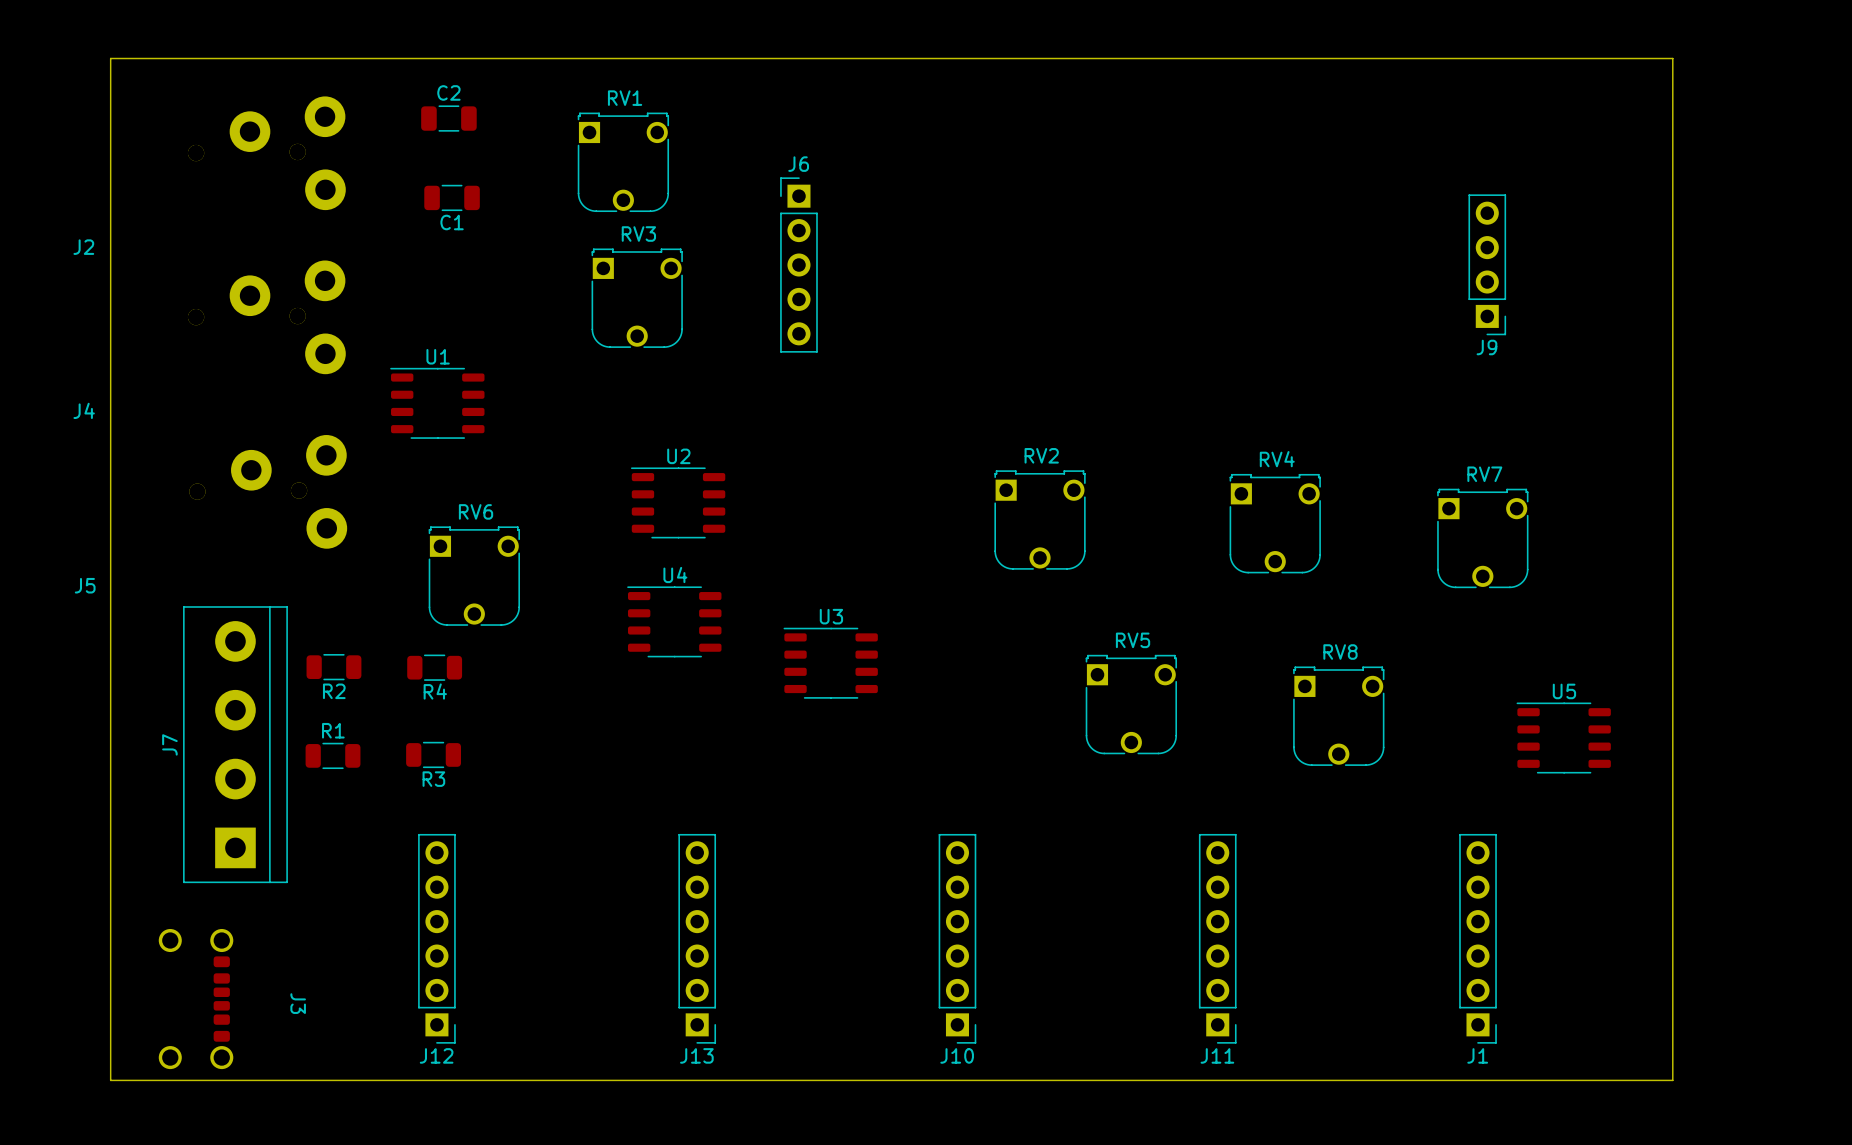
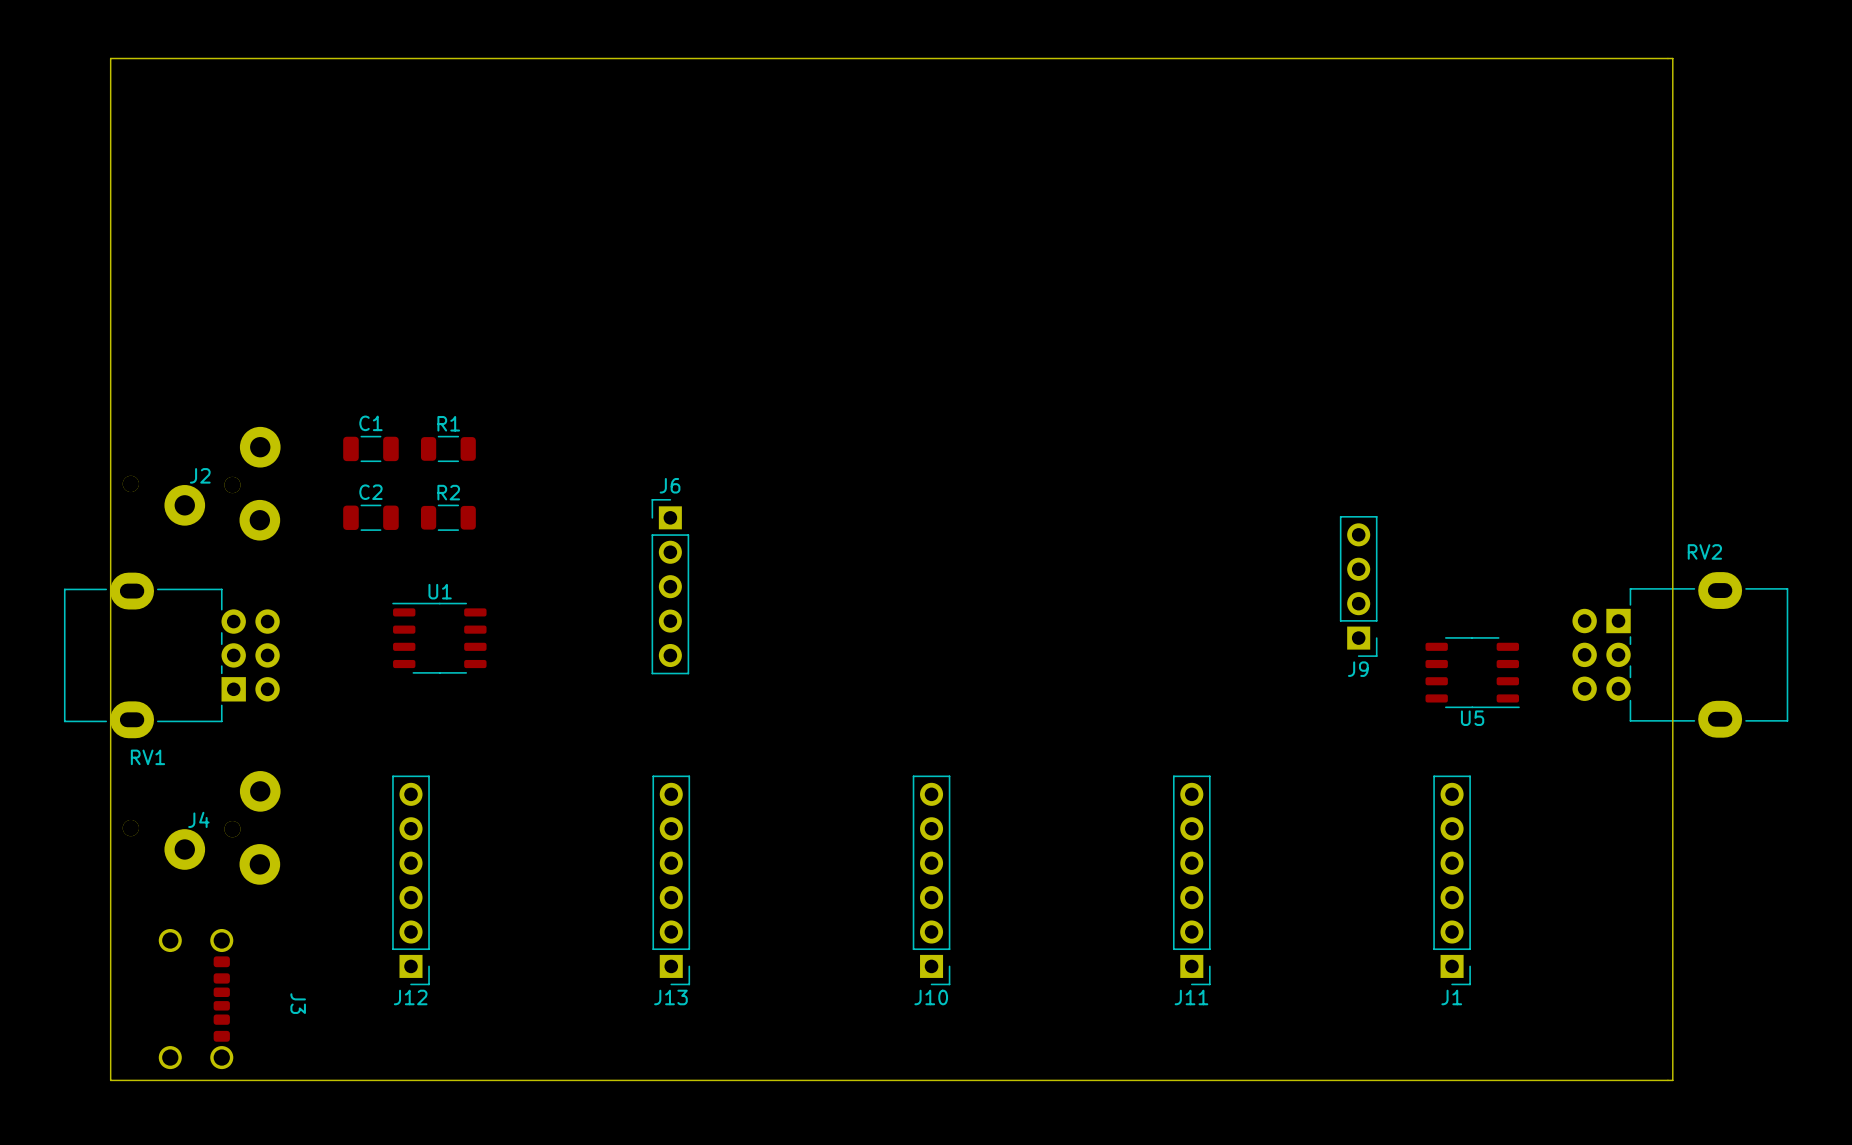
J2 footprint: [187, 96, 346, 211] -> [122, 426, 281, 541]
RV1 name position: RV1 (625, 98) -> RV1 (147, 757)
RV1 footprint: [577, 112, 670, 213] -> [63, 572, 280, 739]
C2 position: (448, 118) -> (370, 517)
C1 position: (452, 197) -> (370, 448)
C1 name position: C1 (452, 222) -> C1 (370, 423)
J2 name position: J2 (83, 247) -> J2 (200, 475)
J4 footprint: [187, 260, 346, 375] -> [122, 771, 281, 885]
J9 position: (1487, 264) -> (1358, 586)
J6 position: (798, 265) -> (670, 586)
RV3: (637, 298) -> none
U1 position: (437, 403) -> (439, 638)
J4 name position: J4 (84, 410) -> J4 (198, 819)
RV2 name position: RV2 (1041, 455) -> RV2 (1704, 551)
RV2 footprint: [994, 470, 1086, 570] -> [1572, 572, 1789, 738]
J5: (268, 491) -> none
U2: (678, 502) -> none
RV4: (1275, 523) -> none
RV7: (1482, 538) -> none
RV6: (474, 576) -> none
U4: (674, 621) -> none
U3: (830, 663) -> none
R2 position: (333, 667) -> (448, 517)
R4: (434, 667) -> none
R2 name position: R2 (334, 691) -> R2 (448, 492)
RV5: (1131, 704) -> none
RV8: (1338, 716) -> none
U5 rotation: 0° (1563, 738) -> 180° (1472, 672)
U5 position: (1563, 738) -> (1472, 672)
J7: (235, 744) -> none
R3: (433, 754) -> none
R1 position: (333, 755) -> (448, 448)
J12 position: (436, 938) -> (411, 880)
J13 position: (697, 938) -> (671, 880)
J10 position: (957, 938) -> (931, 880)
J11 position: (1217, 938) -> (1191, 880)
J1 position: (1478, 938) -> (1452, 880)

